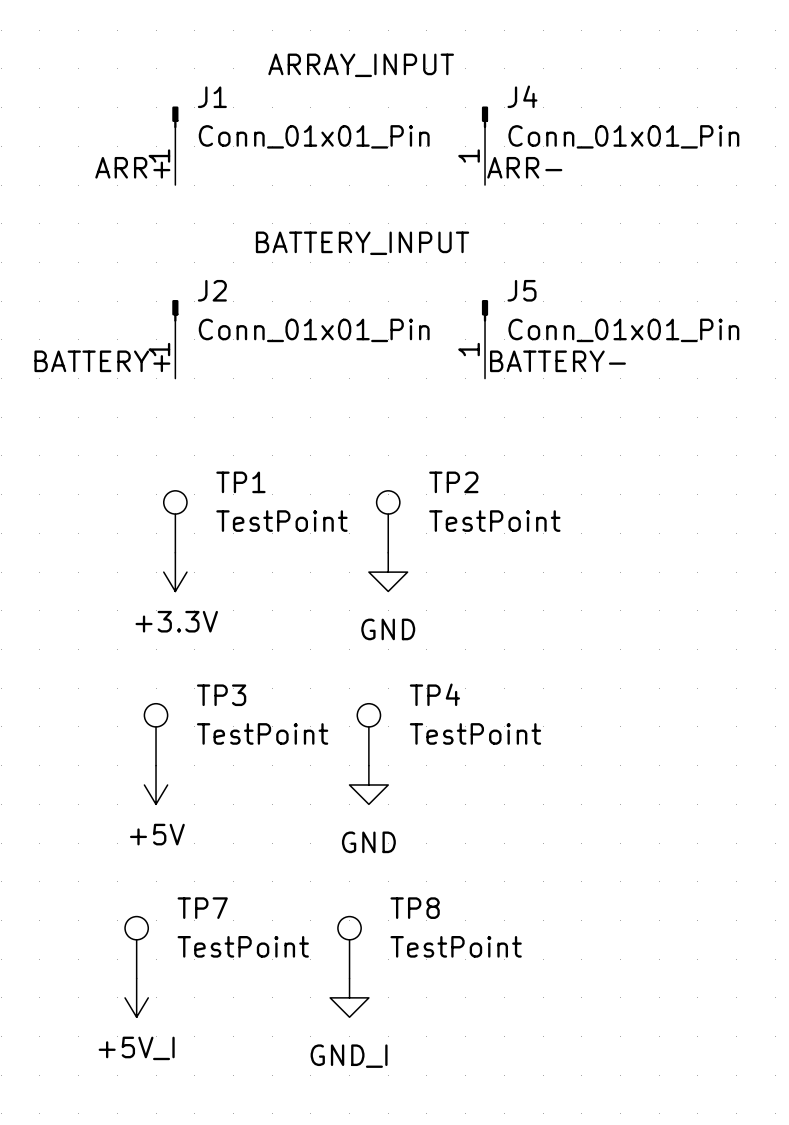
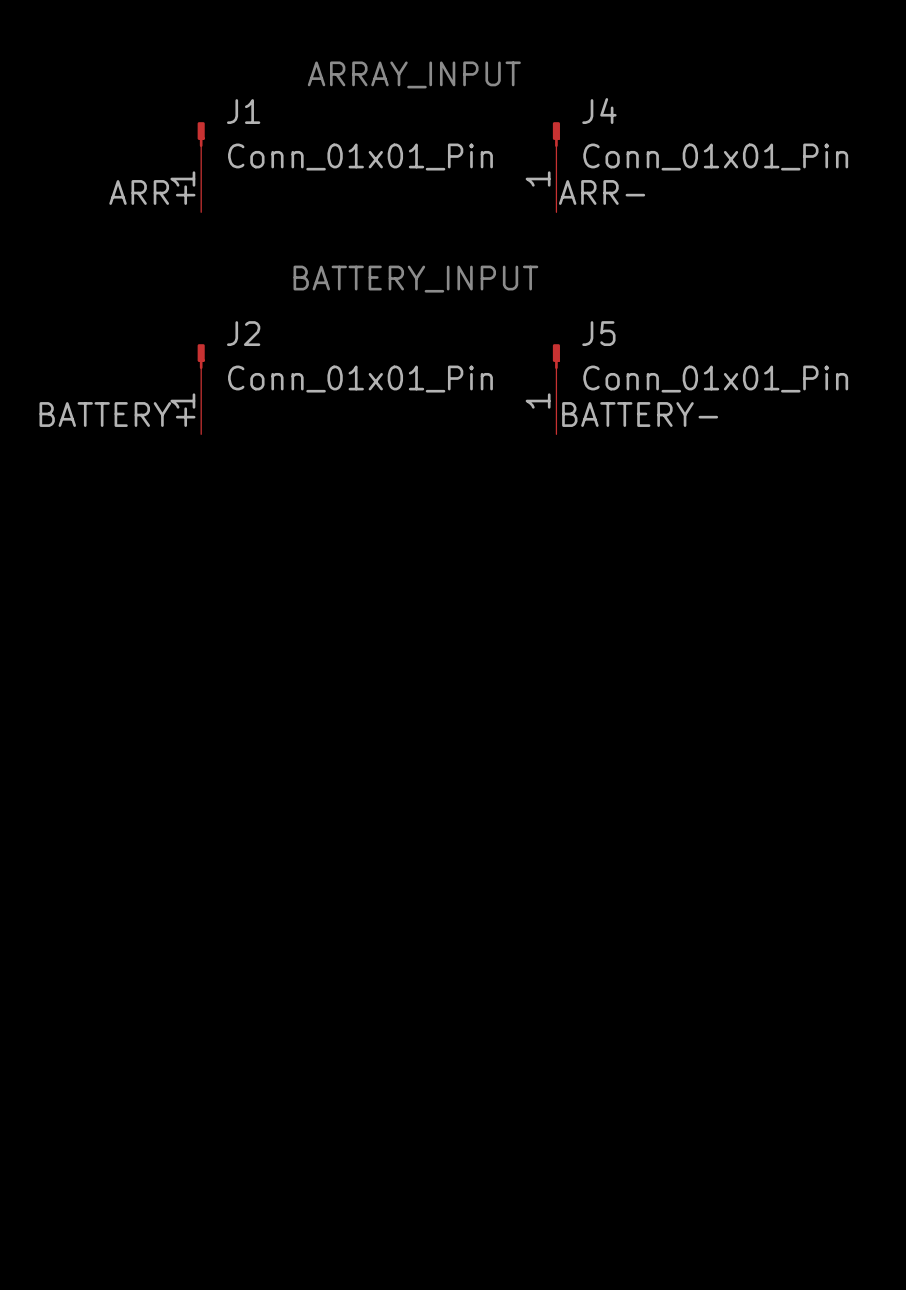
TP1: TestPoint (175, 521) -> none
TP2: TestPoint (388, 521) -> none
power symbol: +3.3V (175, 572) -> none
power symbol: GND (388, 572) -> none
TP3: TestPoint (156, 734) -> none
TP4: TestPoint (368, 734) -> none
power symbol: +5V (156, 784) -> none
power symbol: GND (368, 784) -> none
TP7: TestPoint (136, 947) -> none
TP8: TestPoint (349, 947) -> none
power symbol: +5V_I (136, 997) -> none
power symbol: GND_I (349, 997) -> none

